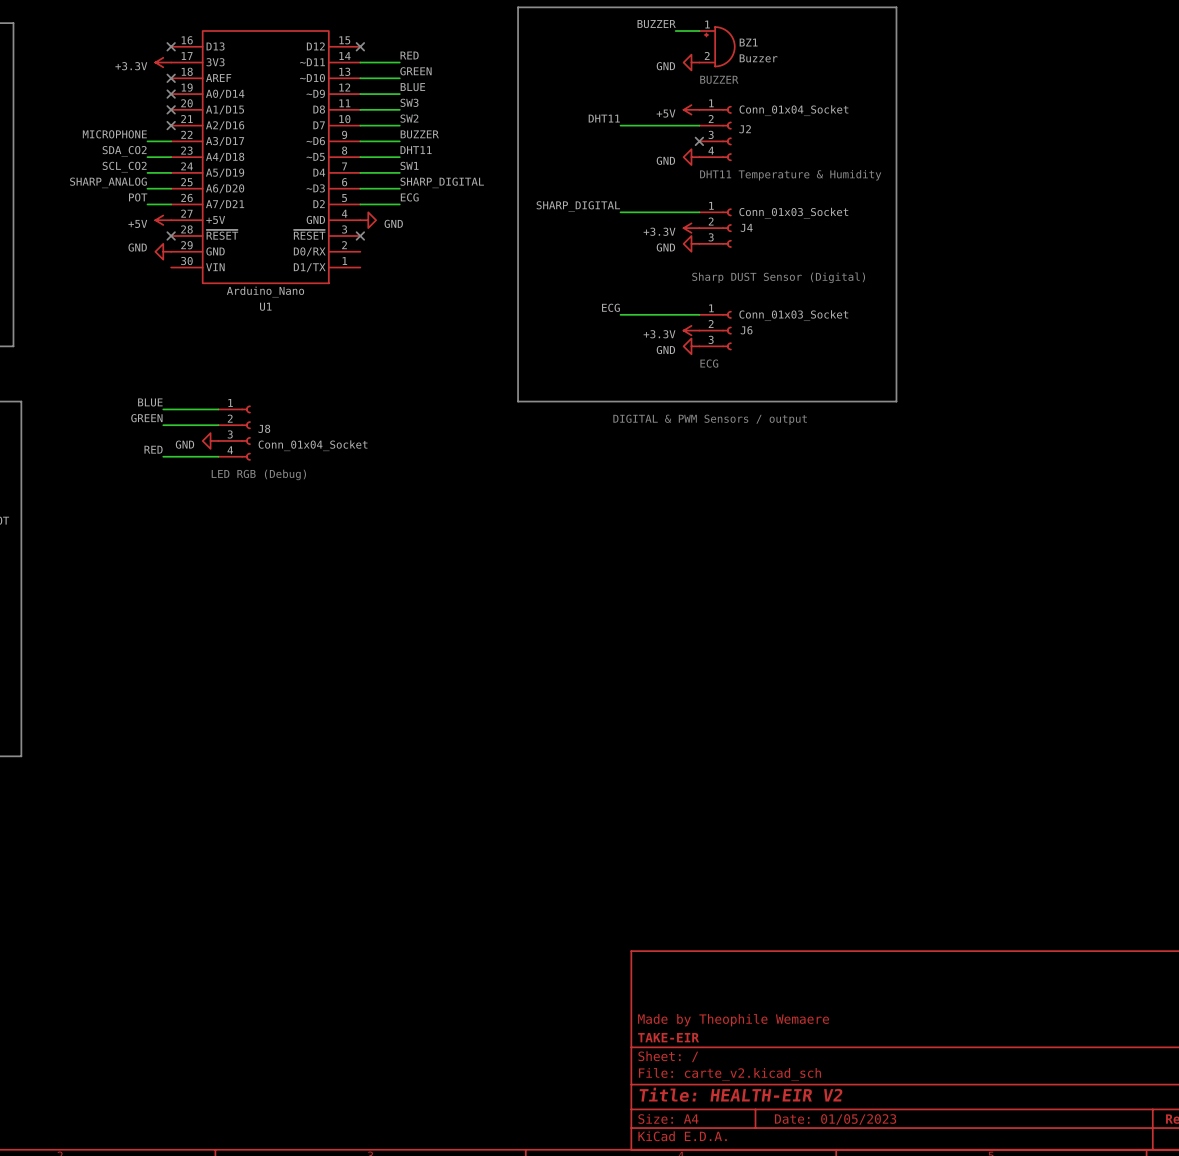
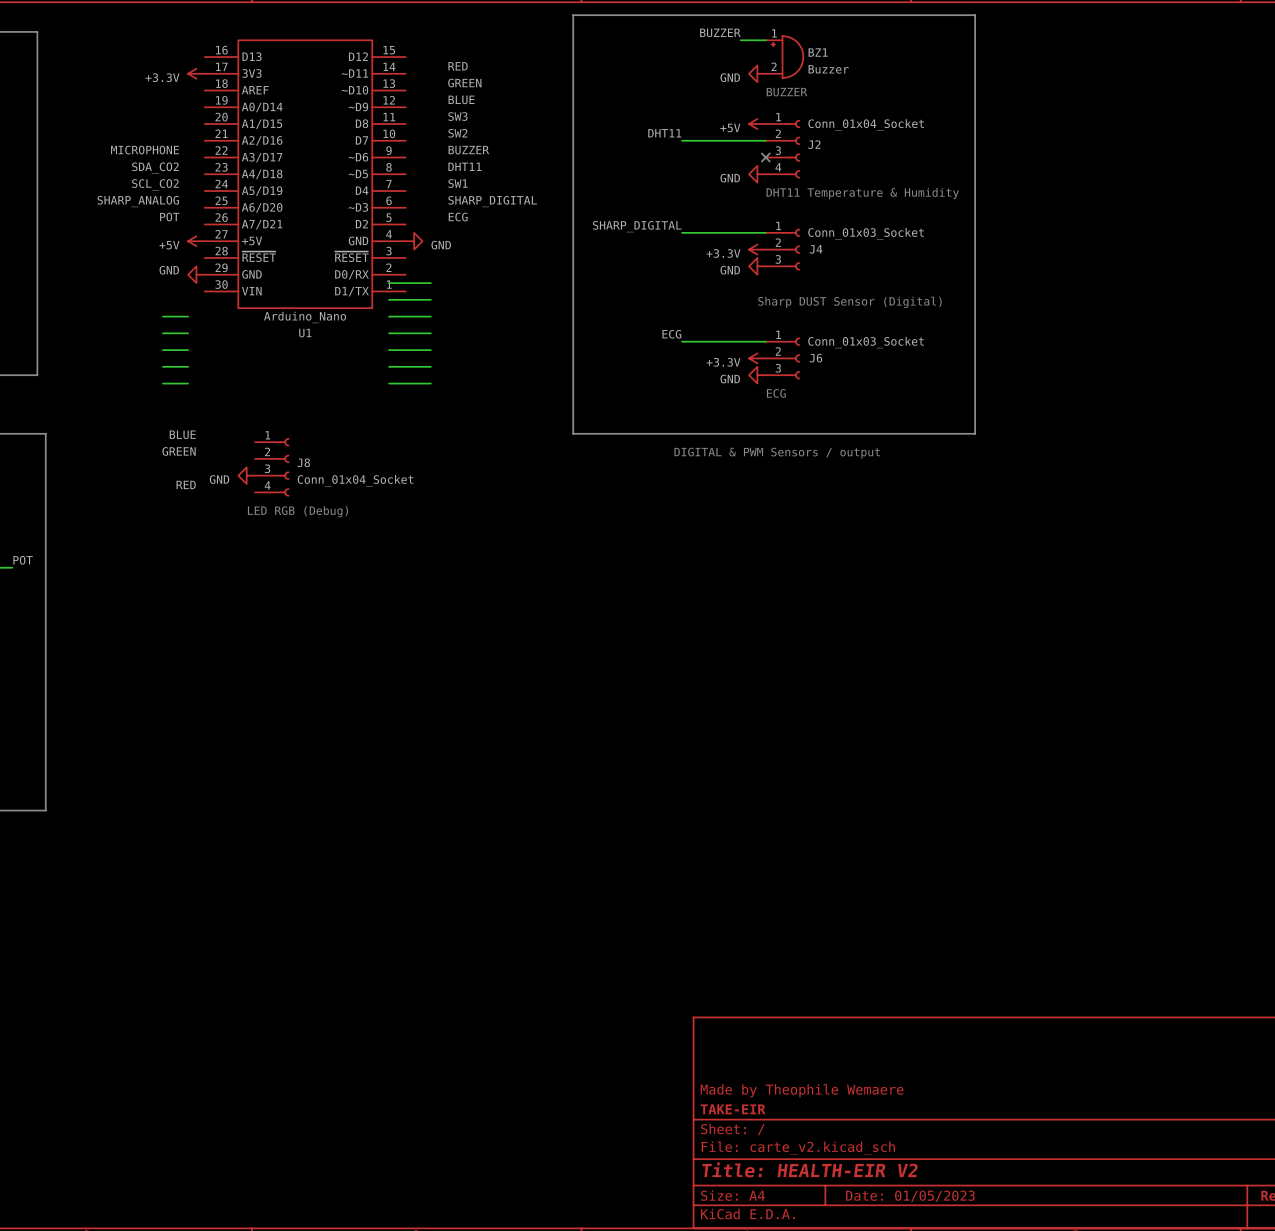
no-connect mark: (171, 46) -> none
no-connect mark: (360, 46) -> none
wire: (360, 62) (399, 62) -> none
no-connect mark: (171, 78) -> none
wire: (360, 78) (399, 78) -> none
no-connect mark: (171, 94) -> none
wire: (360, 94) (399, 94) -> none
no-connect mark: (171, 109) -> none
wire: (360, 109) (399, 109) -> (389, 283) (430, 283)
no-connect mark: (171, 125) -> none
wire: (360, 125) (399, 125) -> (389, 299) (430, 299)
wire: (147, 141) (171, 141) -> (162, 316) (188, 316)
wire: (360, 141) (399, 141) -> (389, 316) (430, 316)
wire: (147, 157) (171, 157) -> (162, 333) (188, 333)
wire: (360, 157) (399, 157) -> (389, 333) (430, 333)
wire: (147, 172) (171, 172) -> (162, 350) (188, 350)
wire: (360, 172) (399, 172) -> (389, 350) (430, 350)
wire: (147, 188) (171, 188) -> (162, 366) (188, 366)
wire: (360, 188) (399, 188) -> (389, 366) (430, 366)
wire: (147, 204) (171, 204) -> (162, 383) (188, 383)
wire: (360, 204) (399, 204) -> (389, 383) (430, 383)
no-connect mark: (171, 235) -> none
no-connect mark: (360, 235) -> none
wire: (163, 409) (218, 409) -> none
wire: (163, 425) (218, 425) -> none
wire: (163, 456) (218, 456) -> none

